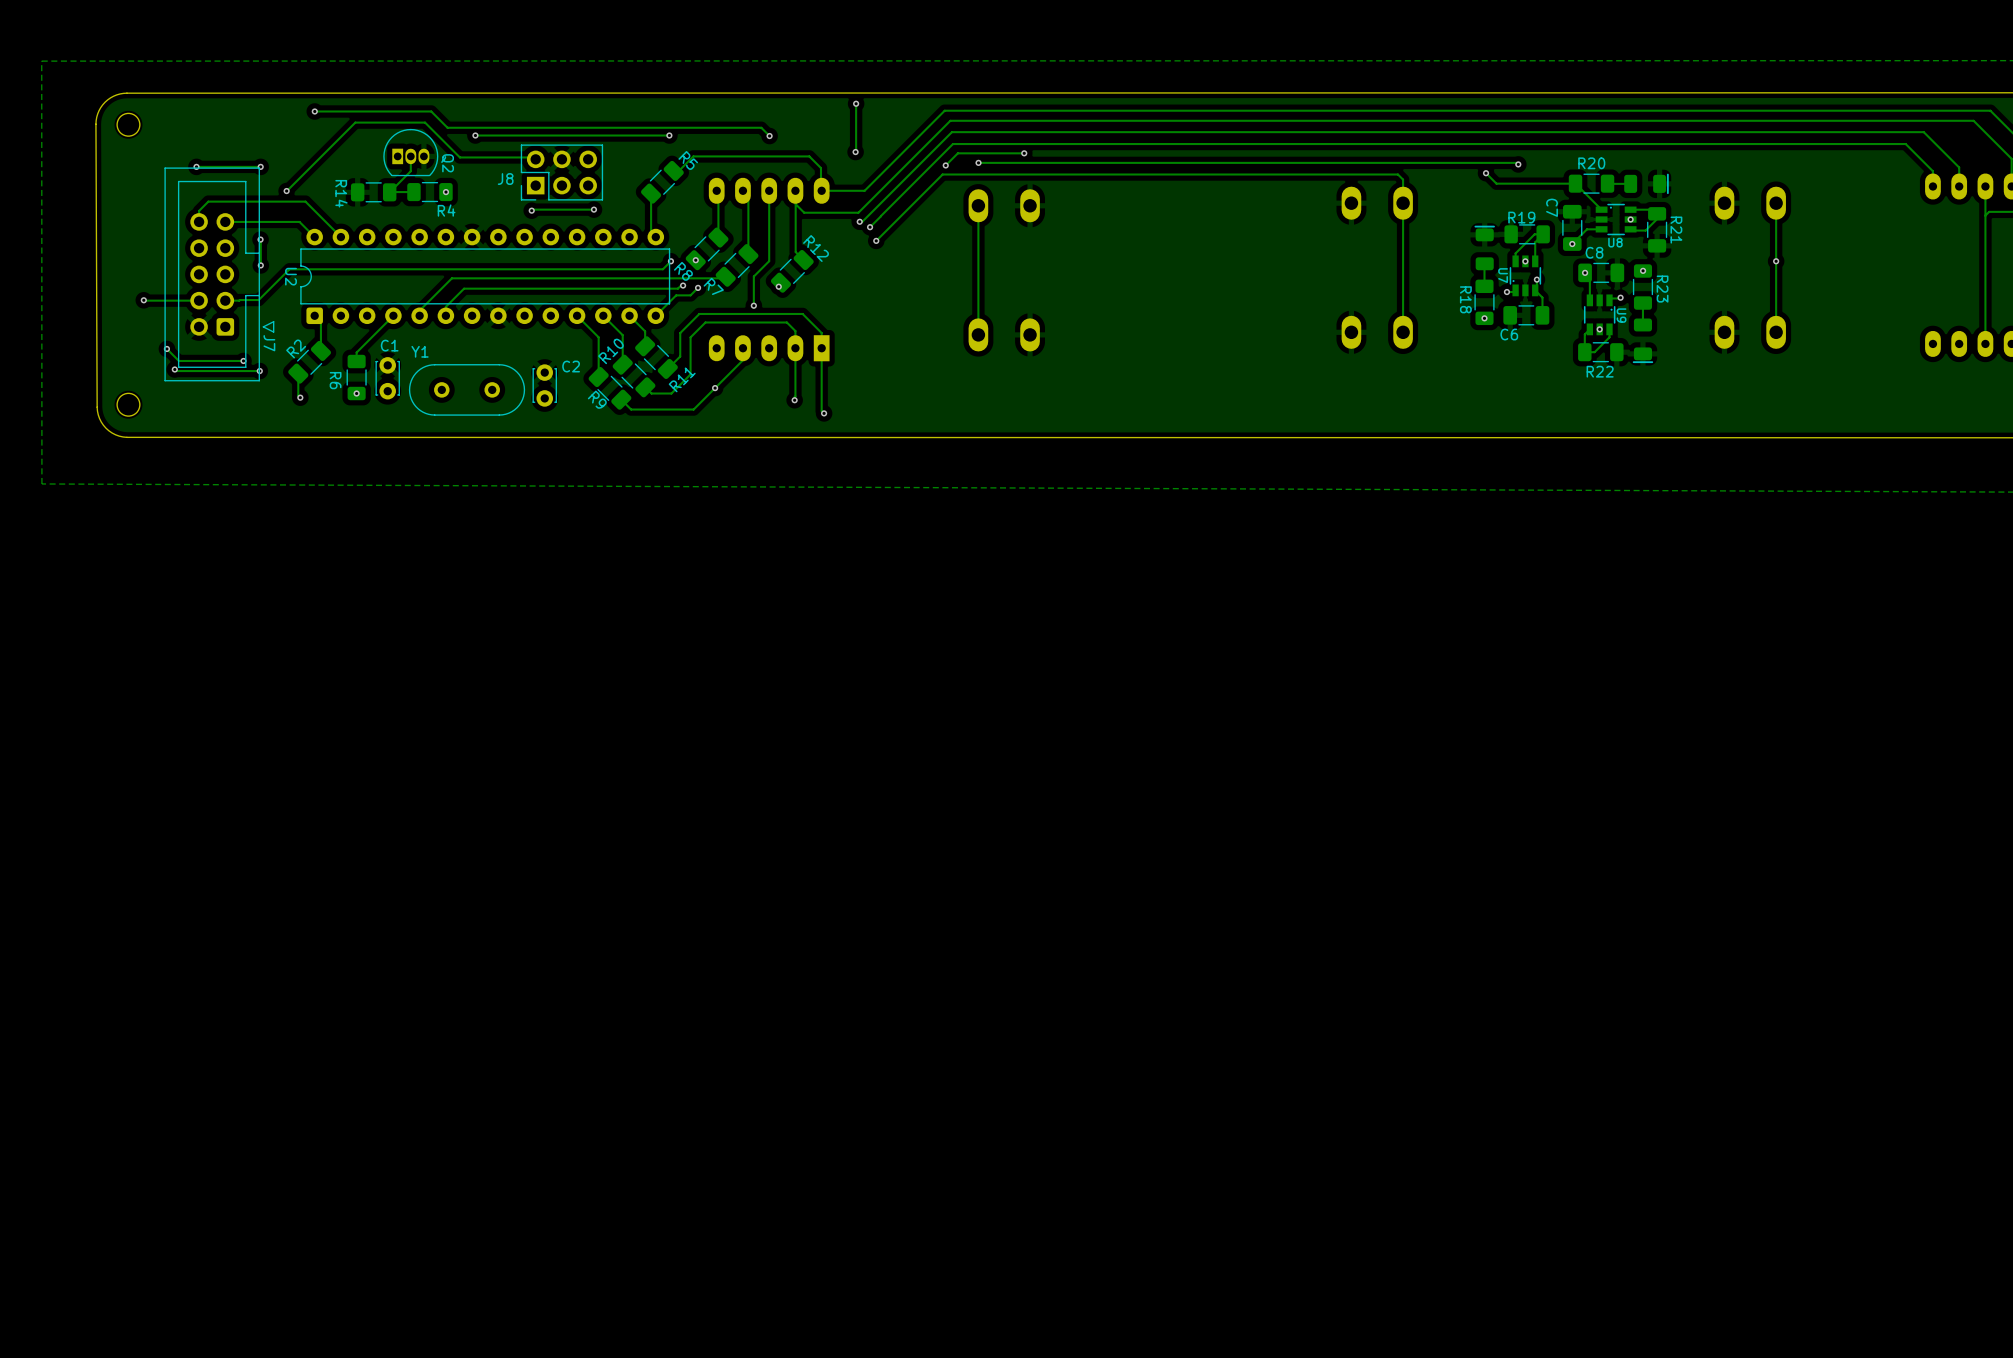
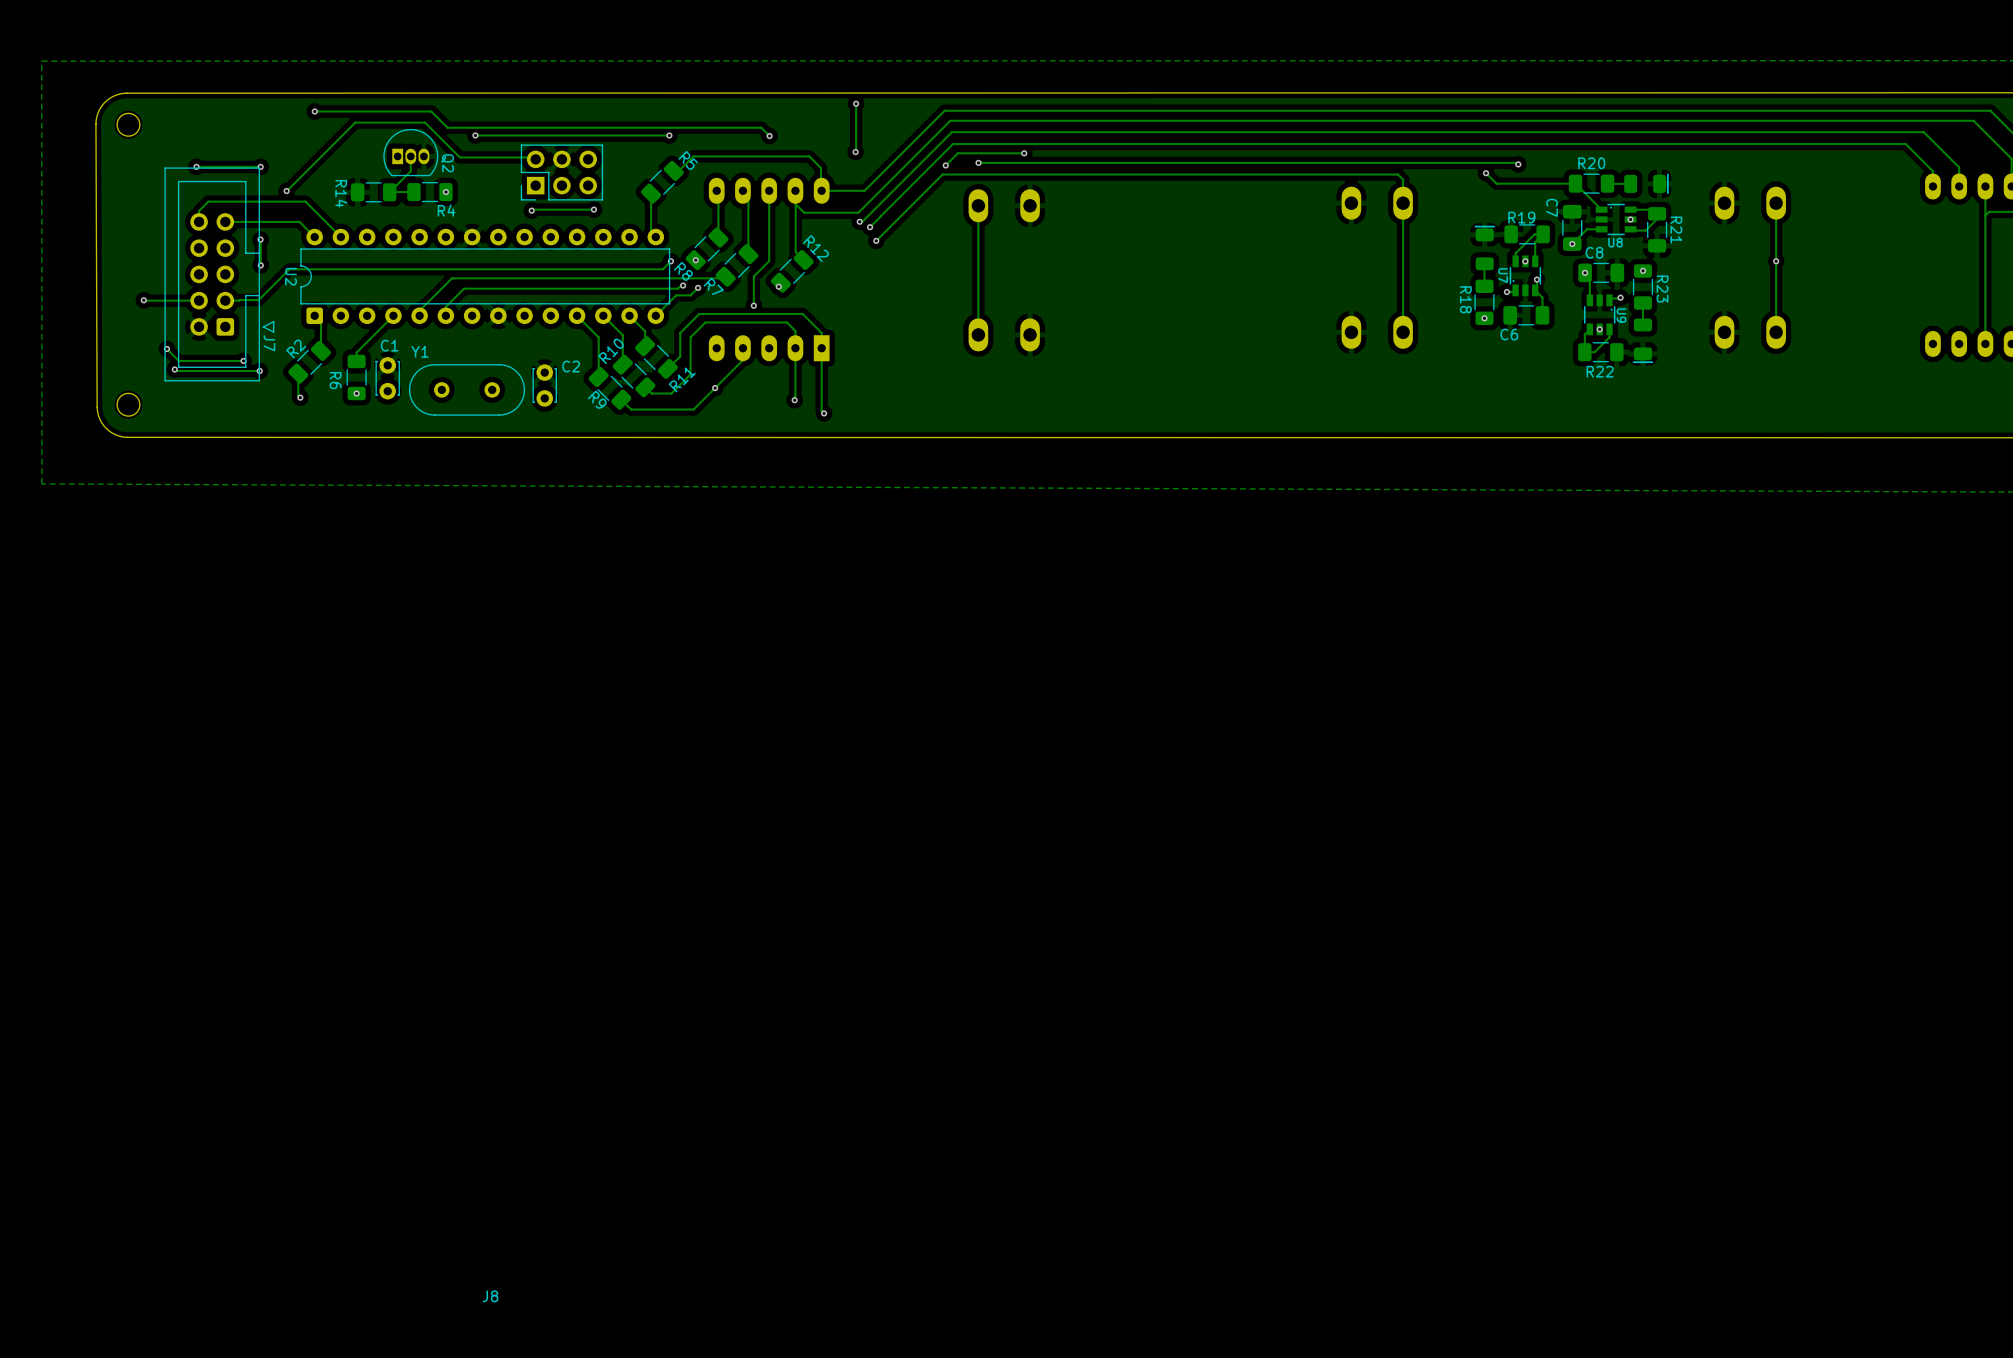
J8 name position: J8 (505, 179) -> J8 (490, 1296)

